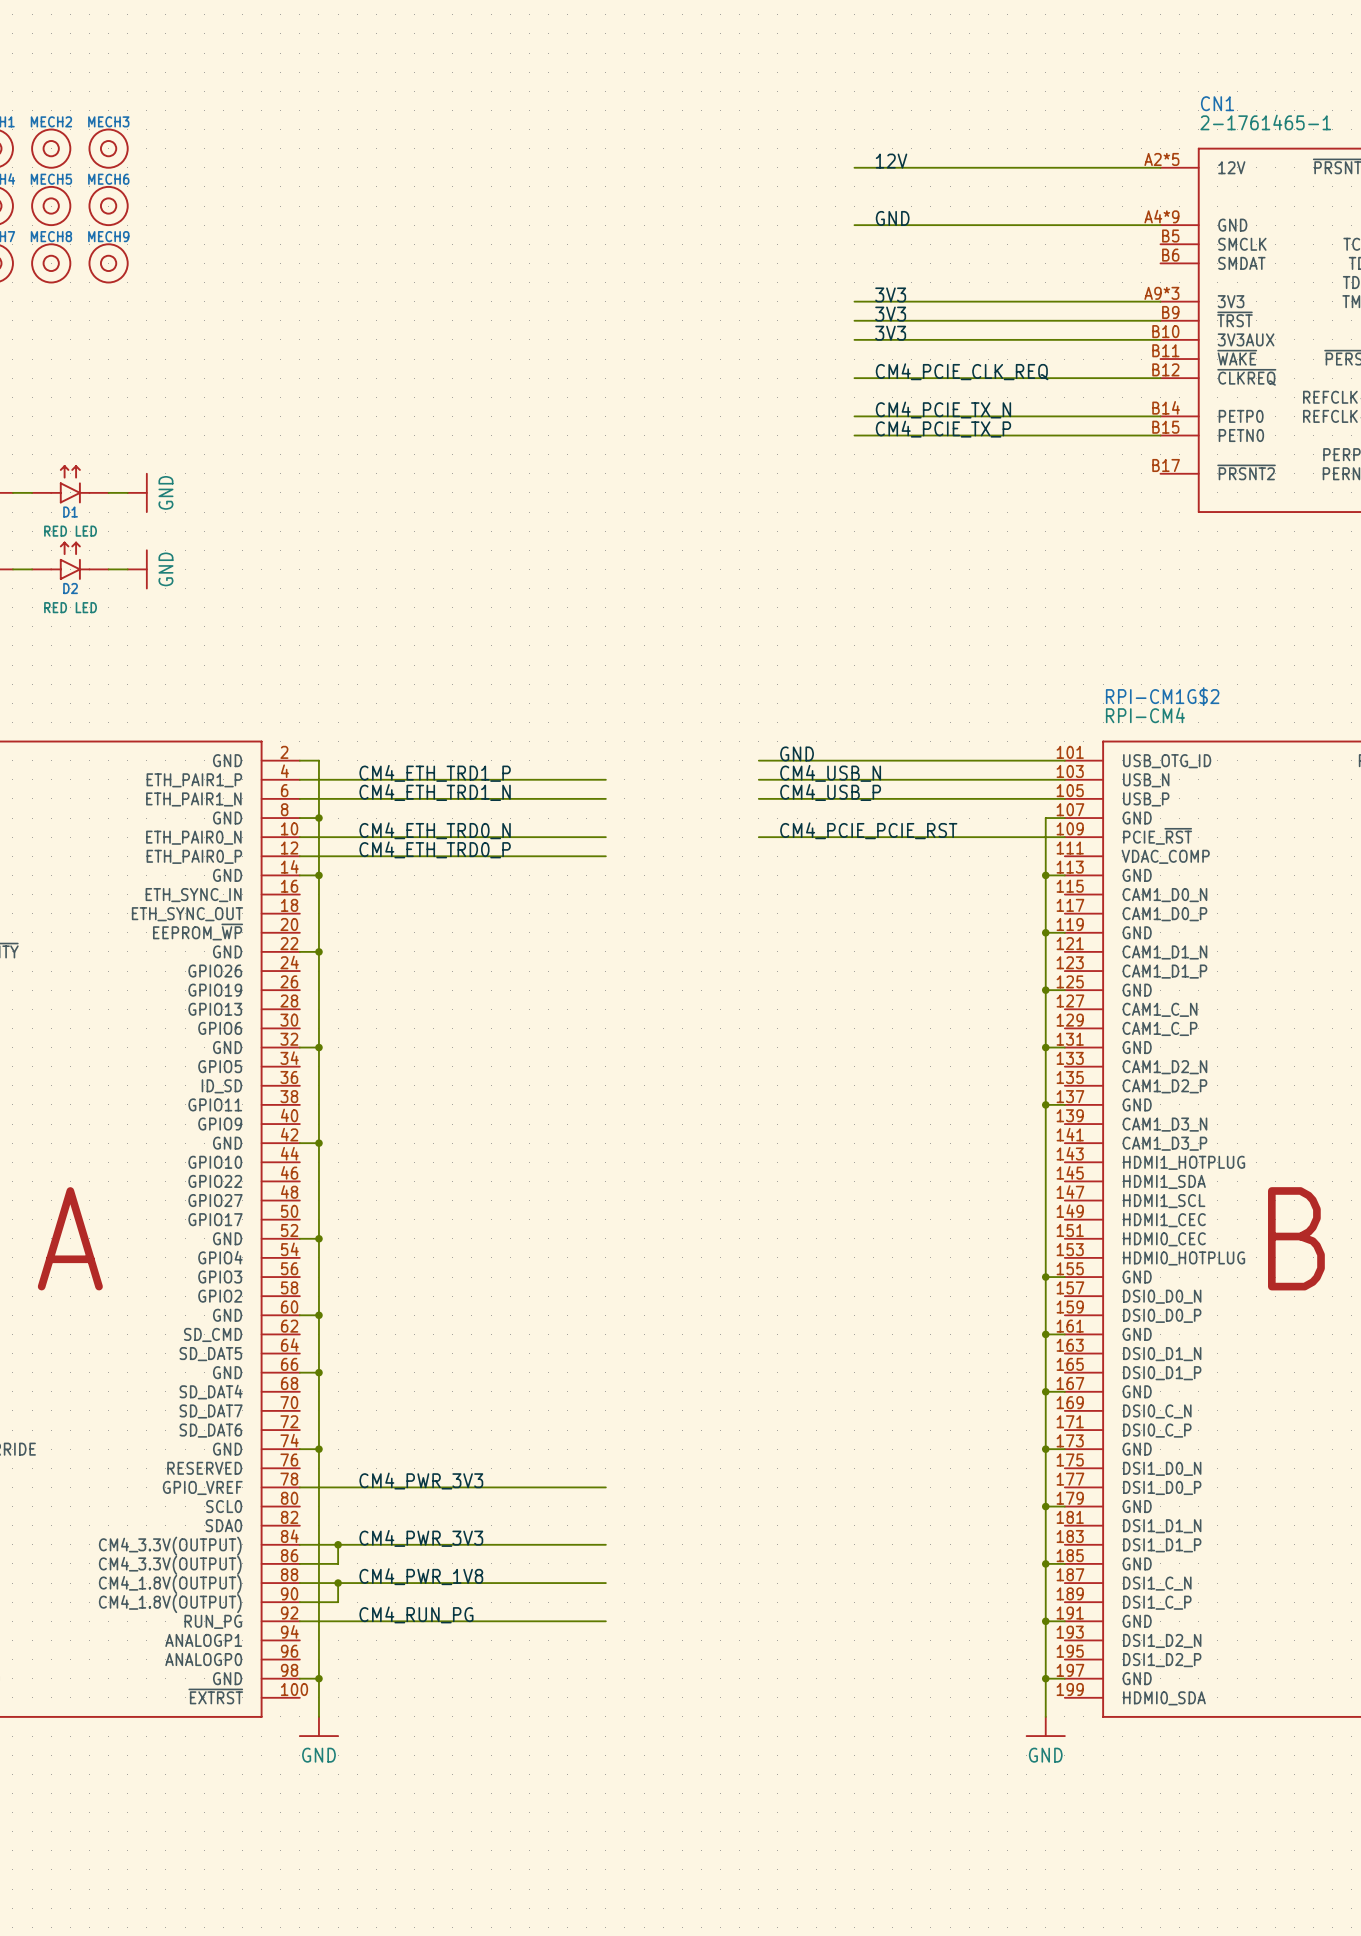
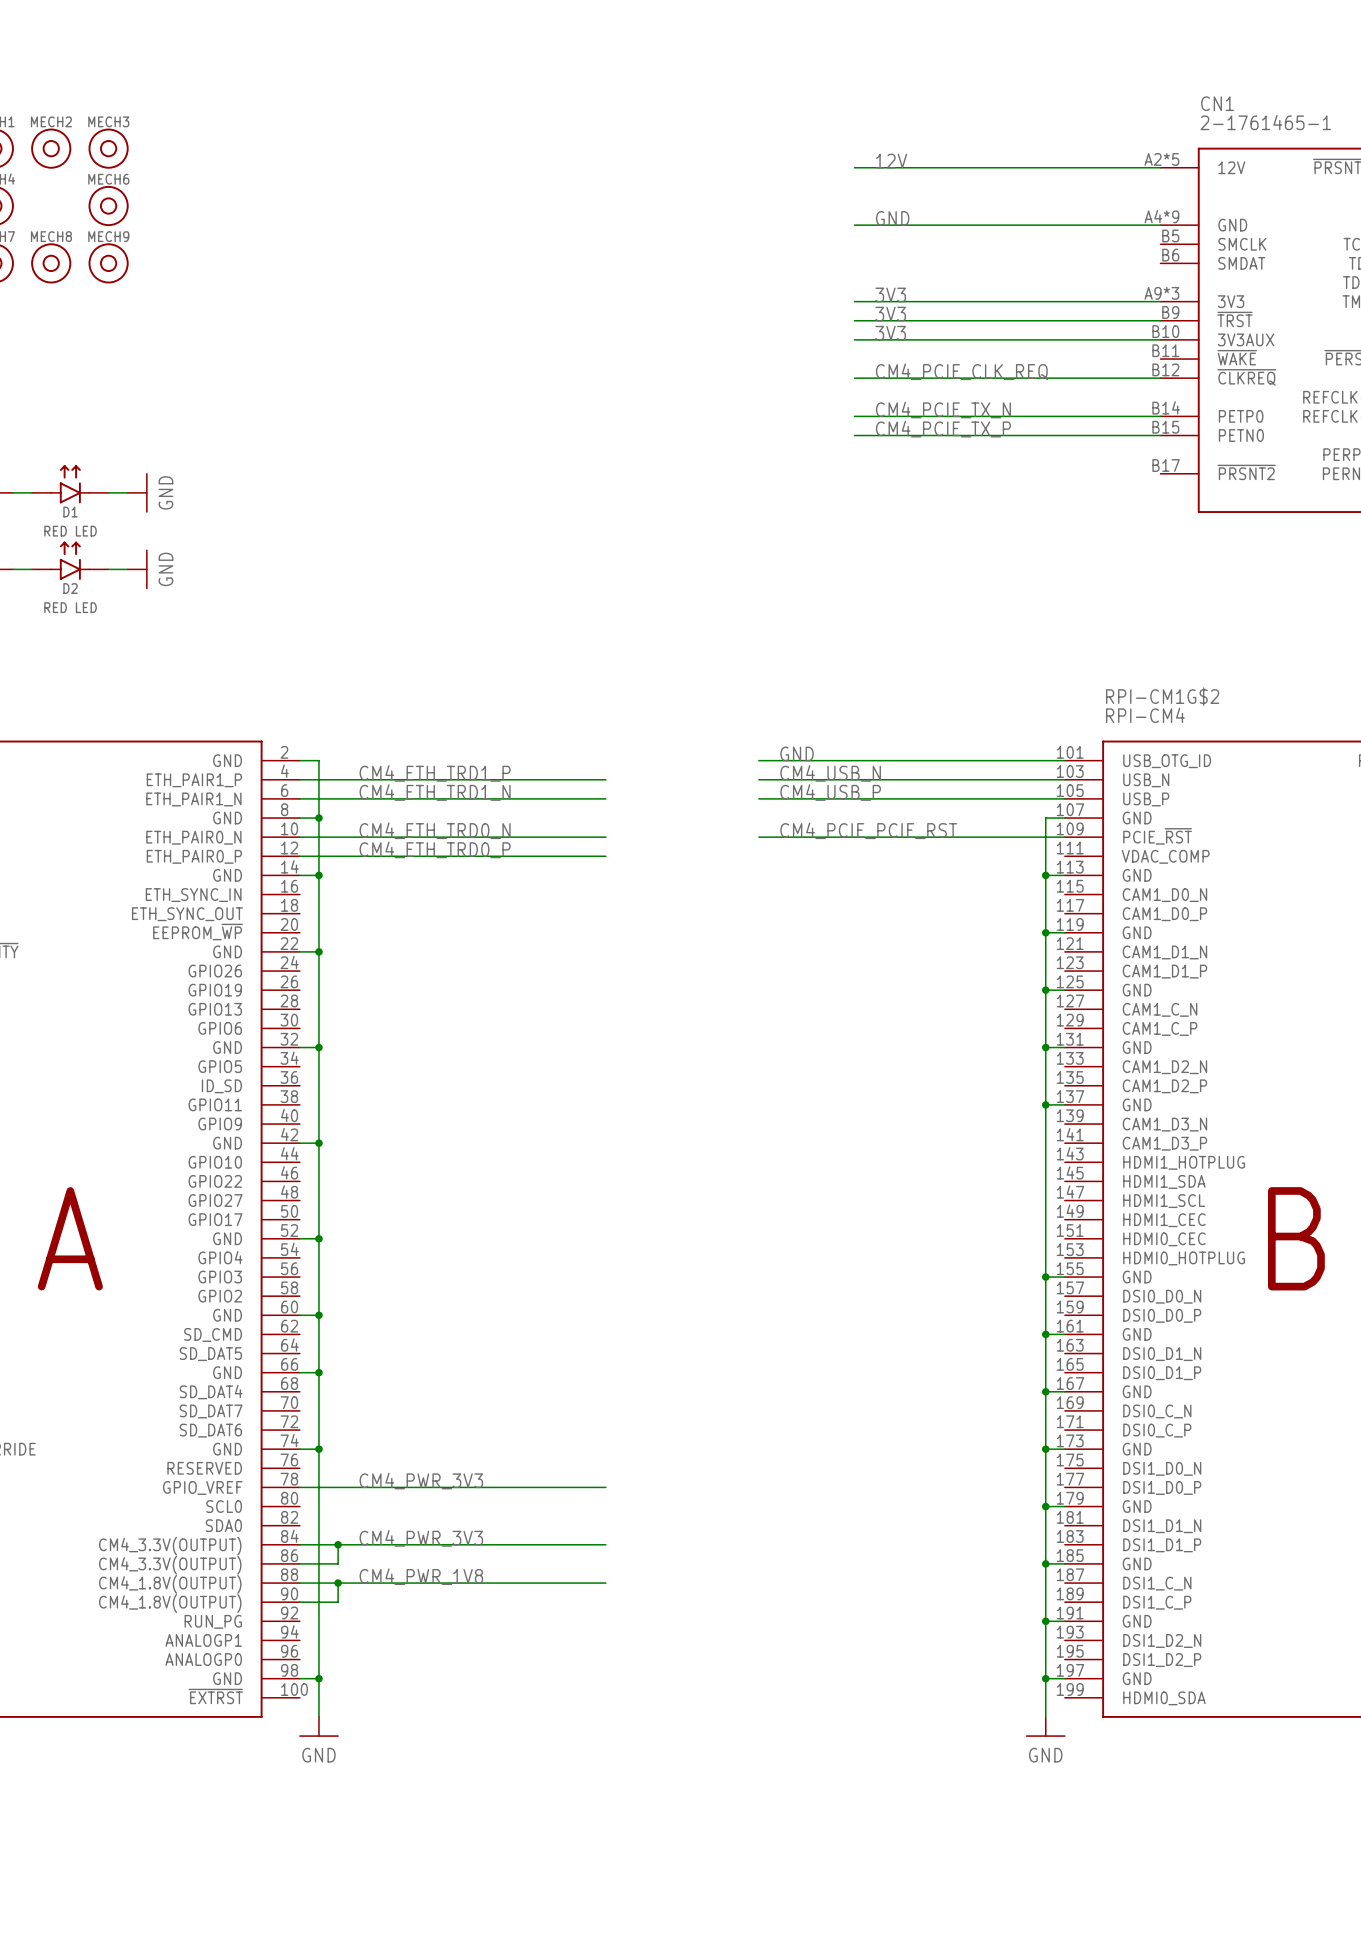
MECH5: (51, 206) -> none
label: CM4_RUN_PG (416, 1614) -> none
wire: (299, 1621) (605, 1621) -> none

